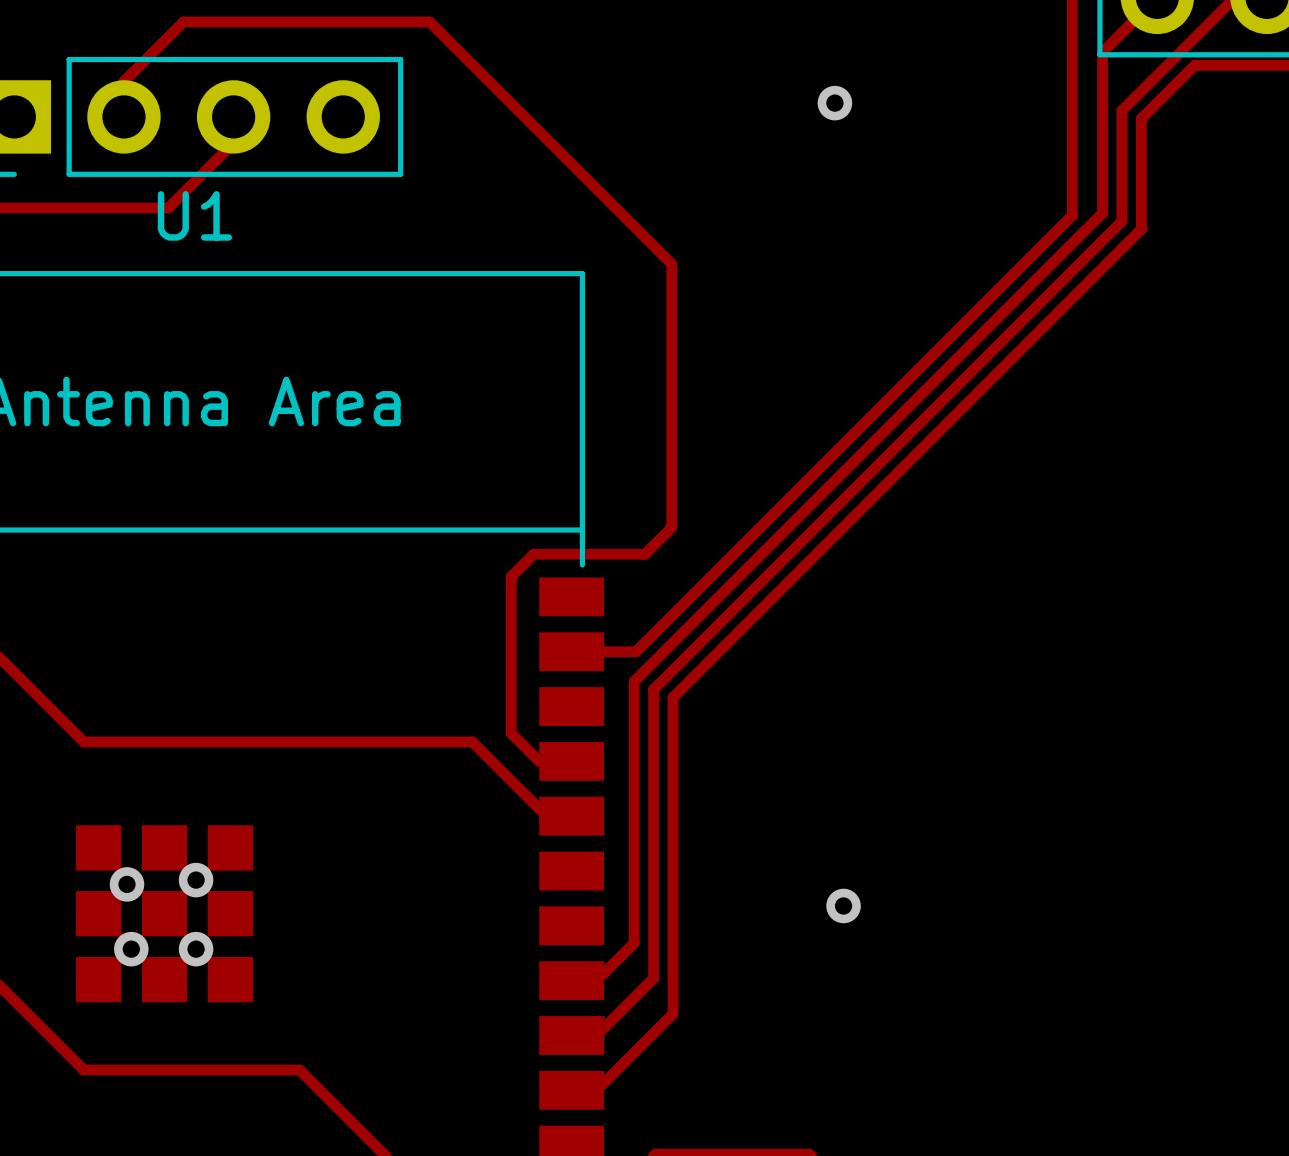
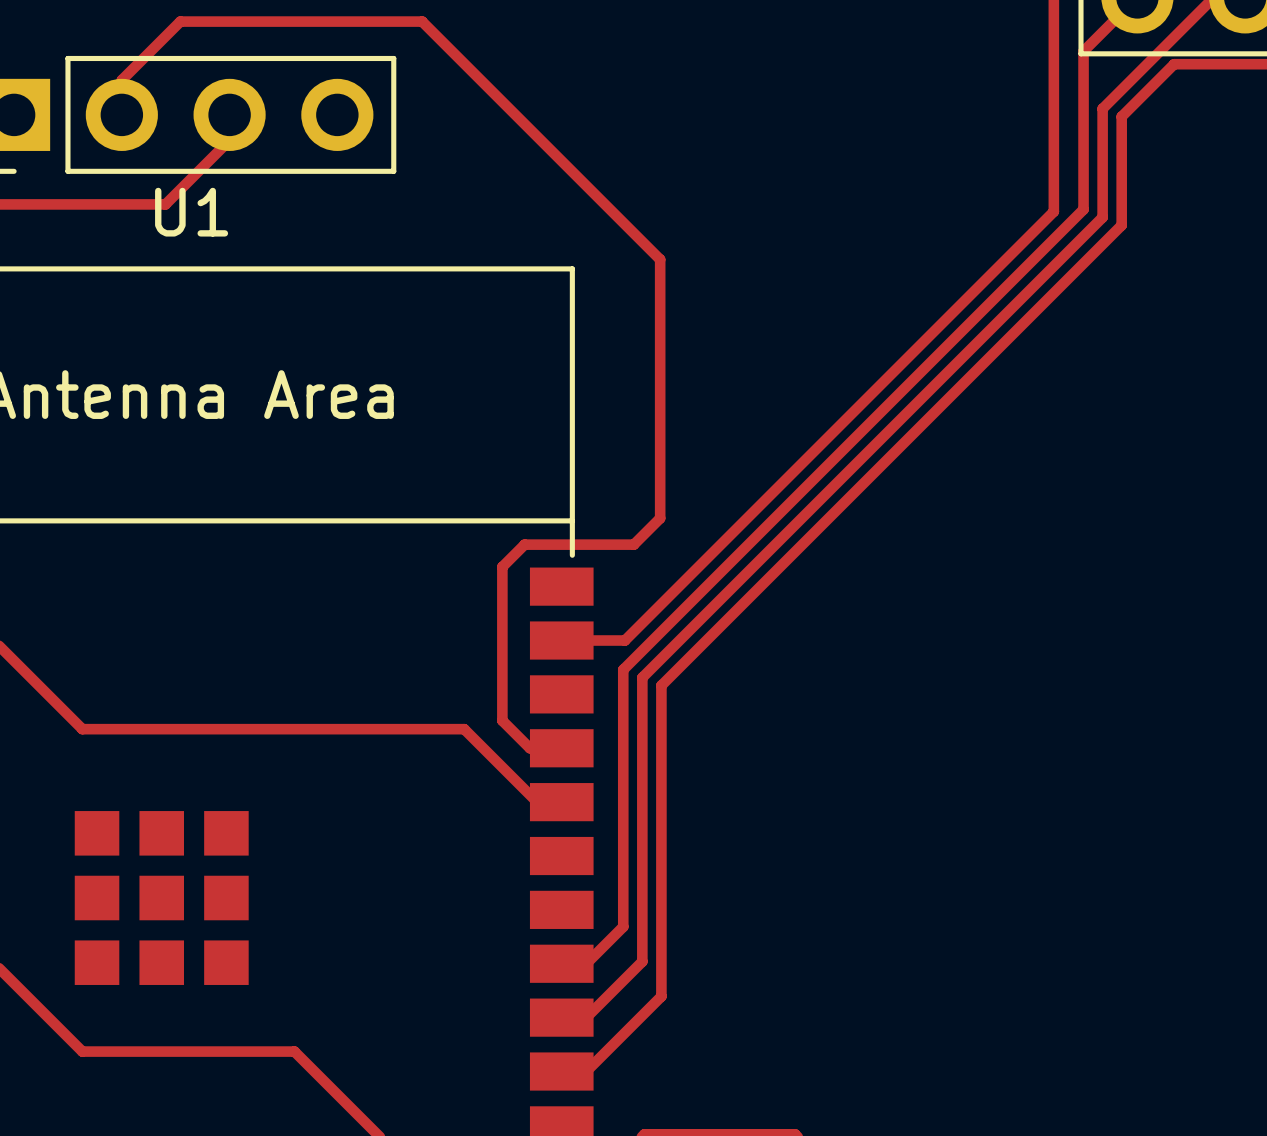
via: (834, 103) -> none
via: (196, 880) -> none
via: (127, 884) -> none
via: (843, 905) -> none
via: (131, 949) -> none
via: (196, 949) -> none

